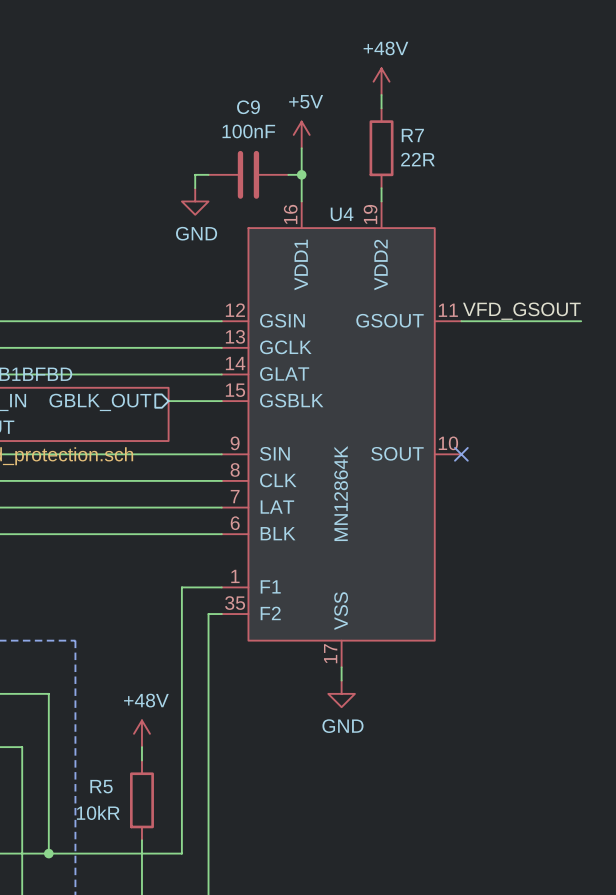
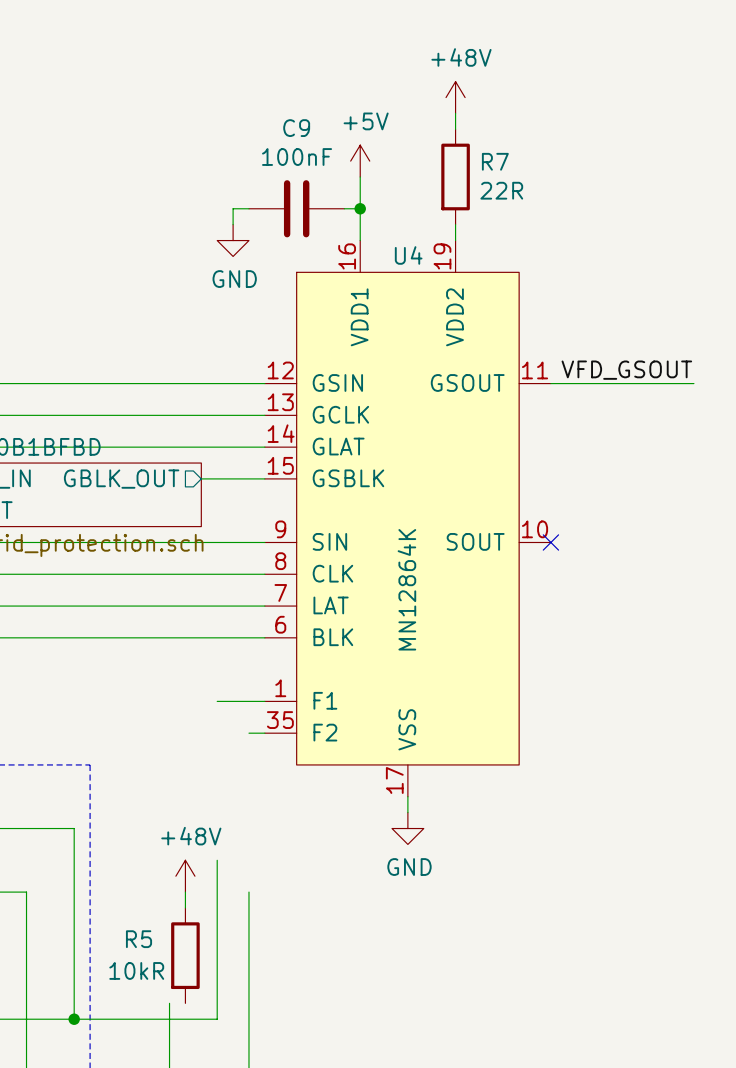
wire: (181, 587) (181, 720) -> none
wire: (208, 614) (208, 747) -> none
wire: (48, 693) (48, 853) -> (58, 828) (74, 828) (74, 1019)
power symbol position: +48V (141, 733) -> +48V (185, 876)
wire: (141, 747) (141, 760) -> (185, 892) (185, 907)
R5 position: (141, 800) -> (185, 955)
junction position: (48, 853) -> (74, 1019)

